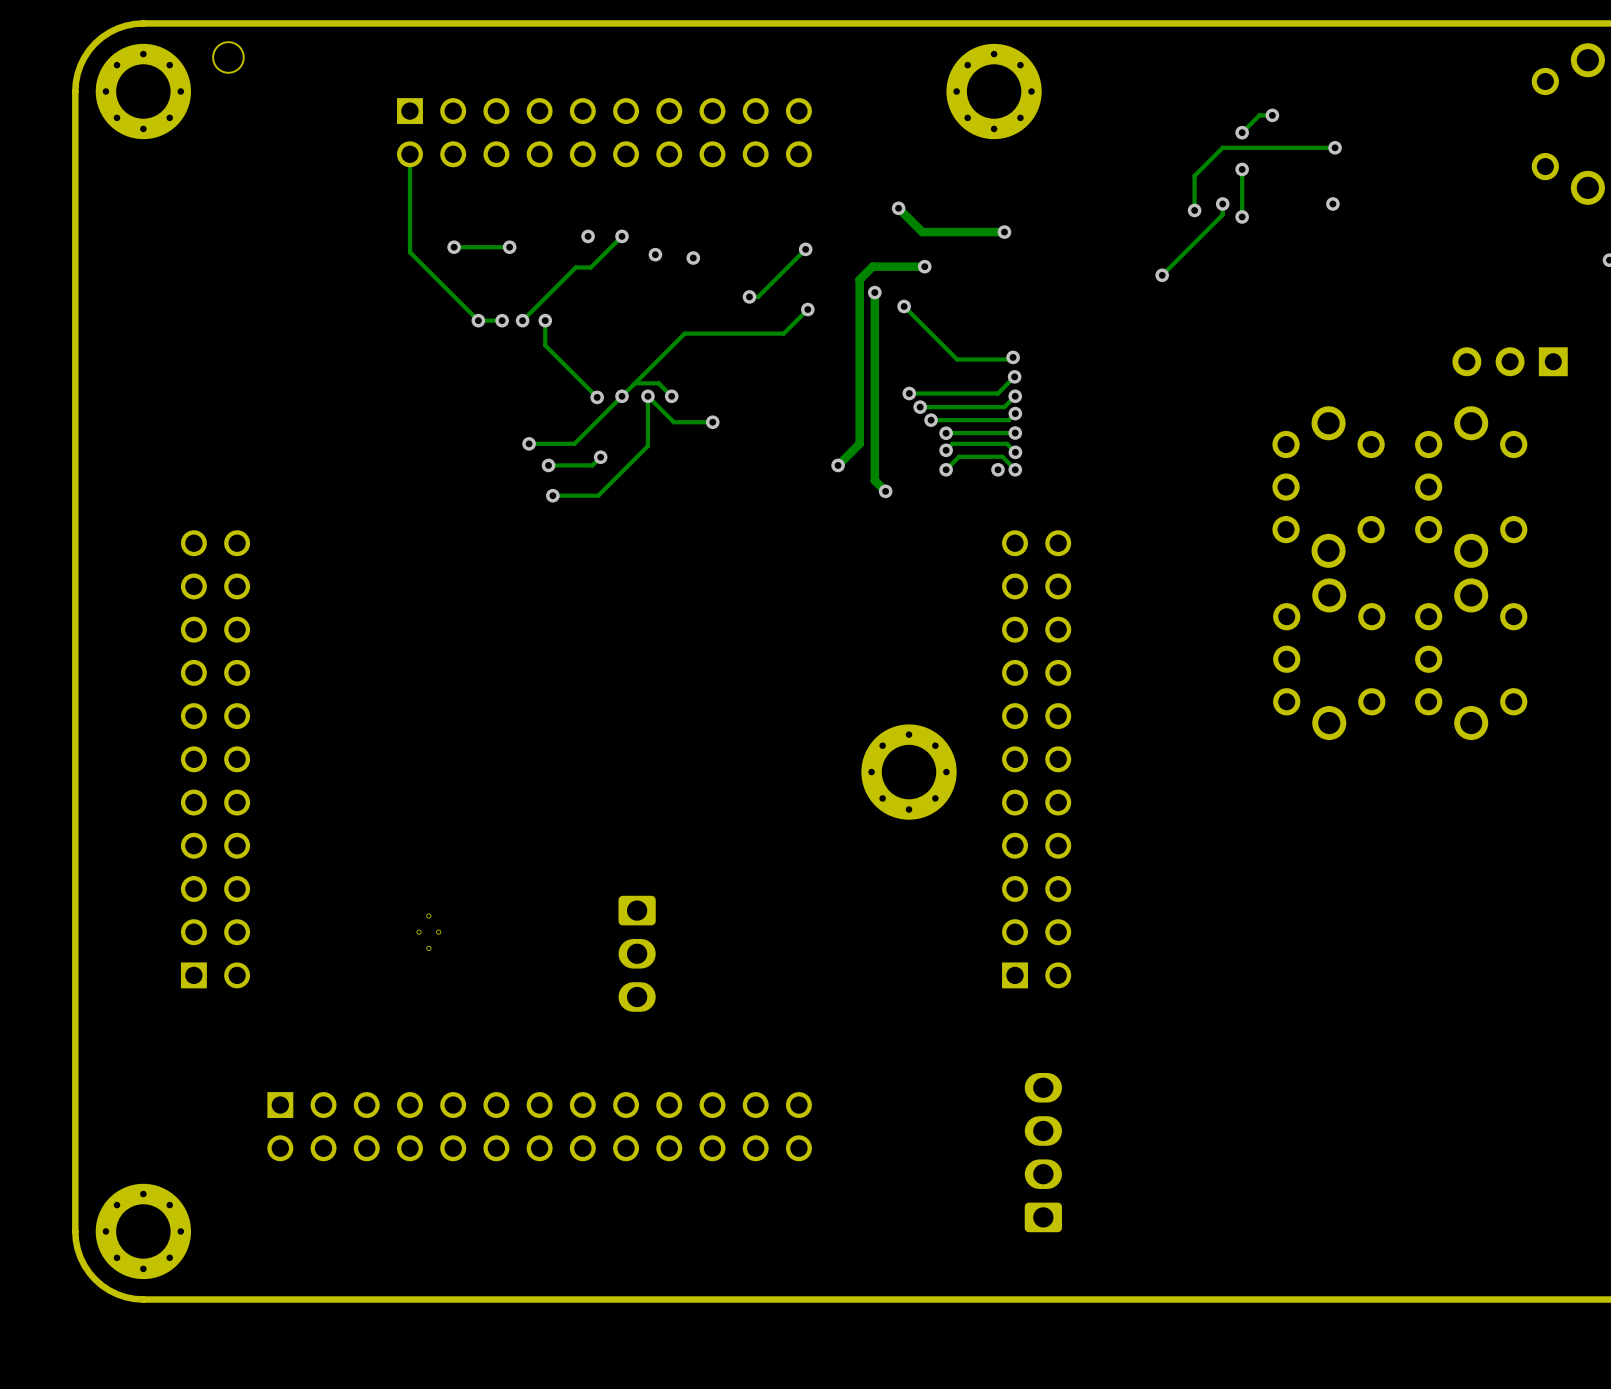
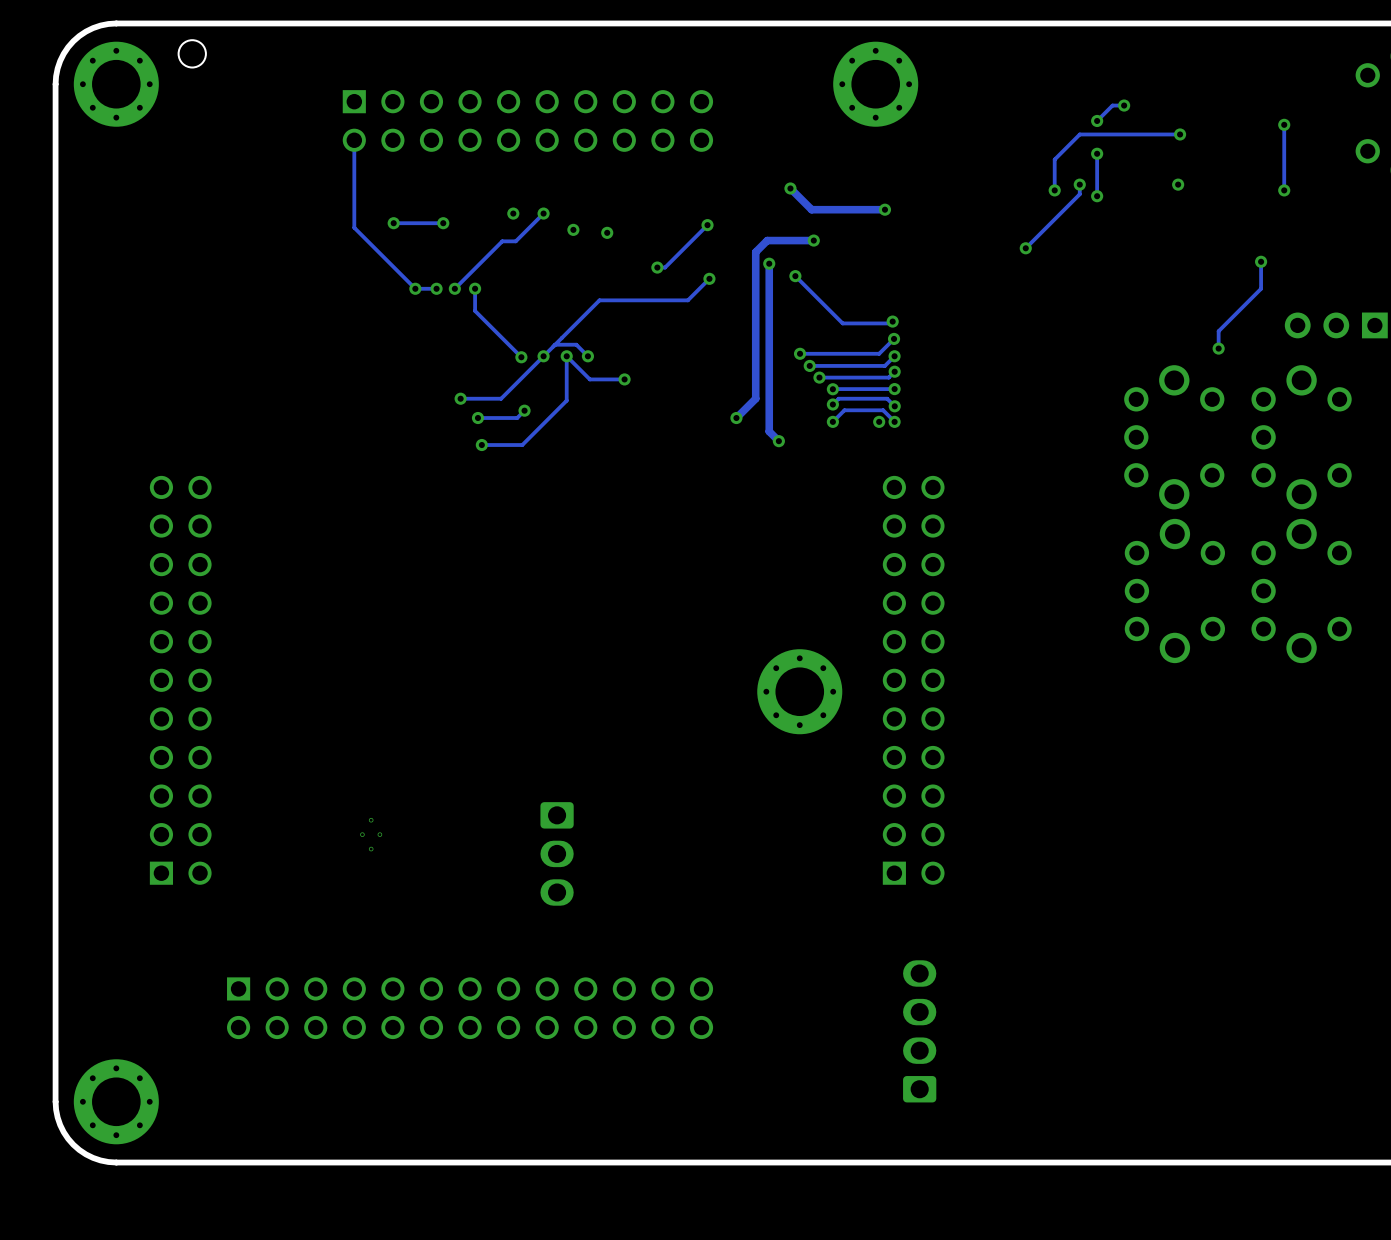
track: none -> (1284, 124) (1284, 190)
via: none -> (1284, 124)
via: none -> (1284, 190)
track: none -> (1261, 261) (1261, 288) (1218, 331) (1218, 348)
via: none -> (1261, 261)
via: none -> (1218, 348)

